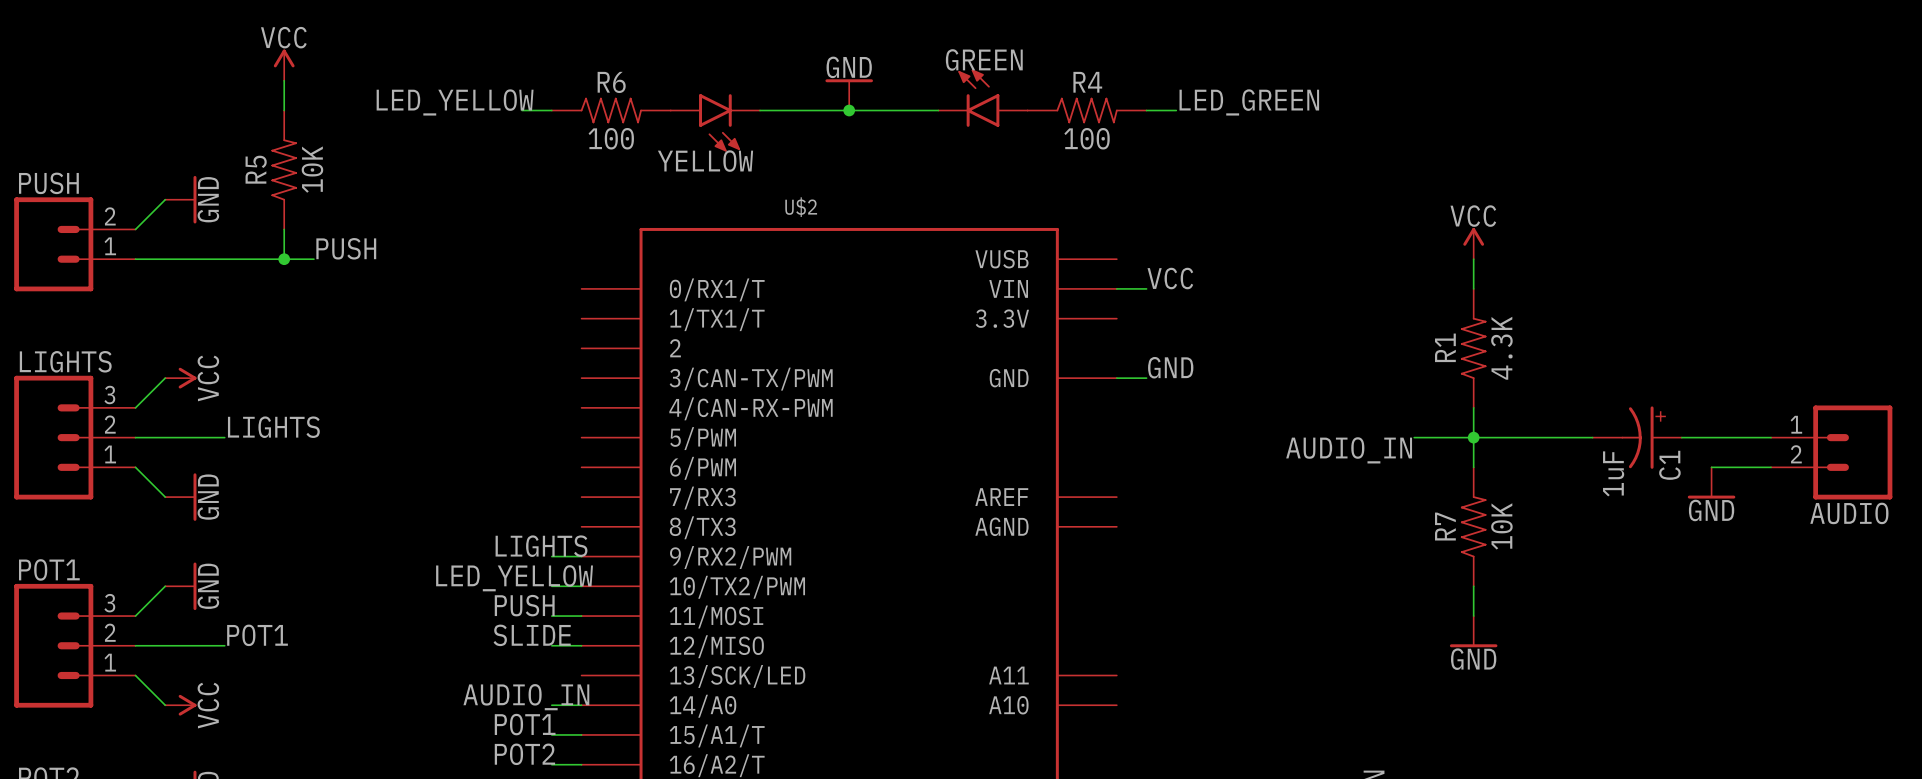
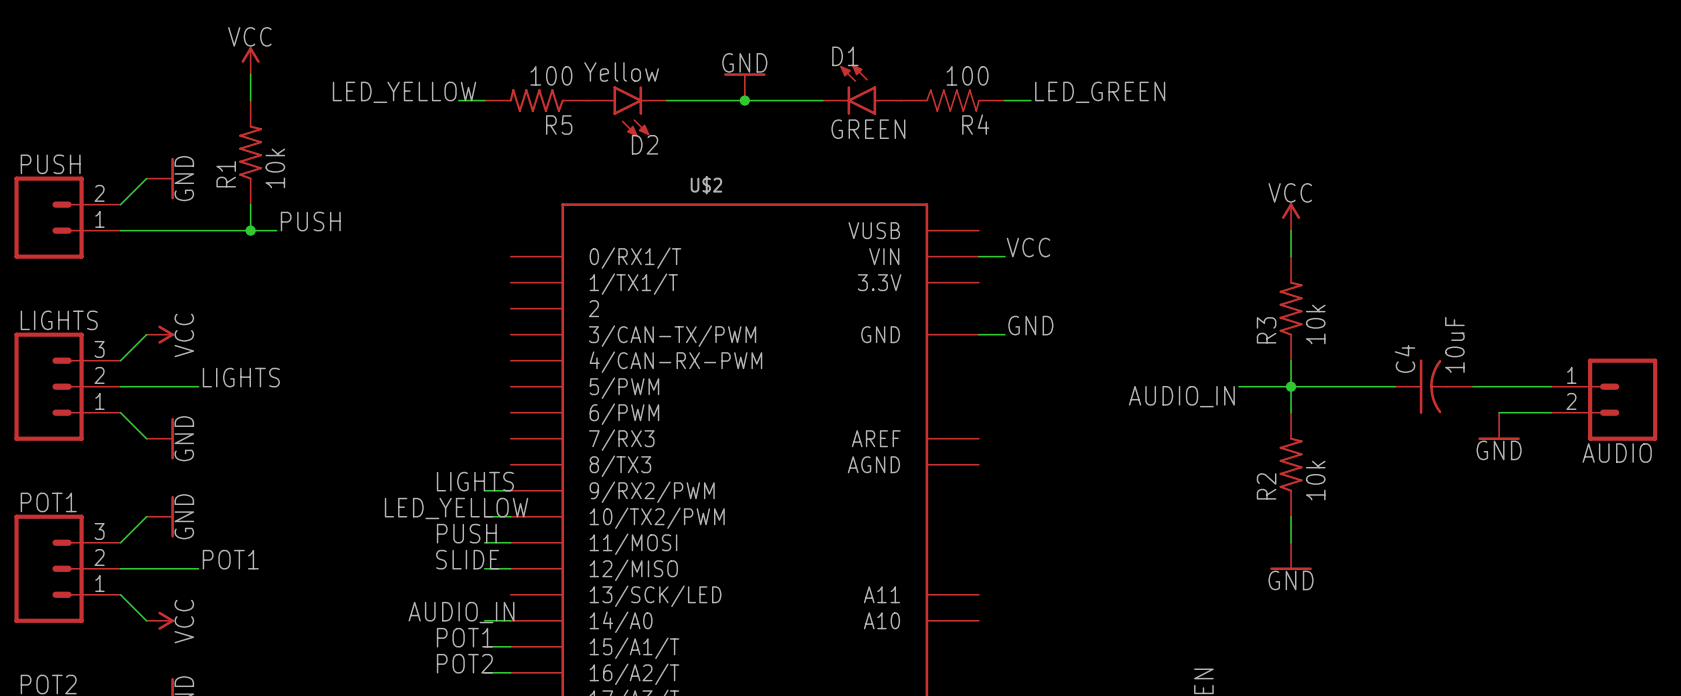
GREEN name: GREEN (984, 59) -> D1 (845, 56)
YELLOW value: none -> Yellow (621, 71)
R4 name position: R4 (1087, 82) -> R4 (975, 124)
R5 symbol: [271, 110, 297, 230] -> [484, 89, 589, 113]
R6: 100 (611, 110) -> none
R4 value position: 100 (1087, 138) -> 100 (967, 75)
GREEN value: none -> GREEN (868, 129)
YELLOW name: YELLOW (705, 161) -> D2 (645, 144)
R5 name position: R5 (256, 169) -> R5 (559, 125)
R5 value: 10K (312, 169) -> 100 (551, 75)
R1 symbol: [1460, 288, 1487, 408] -> [239, 100, 263, 205]
R3: none -> 10k (1291, 308)
R1 value: 4.3K (1501, 348) -> 10k (275, 168)
C1: 1uF (1637, 437) -> none
C4: none -> 10uF (1434, 386)
R7: 10K (1473, 526) -> none
R2: none -> 10k (1291, 464)

